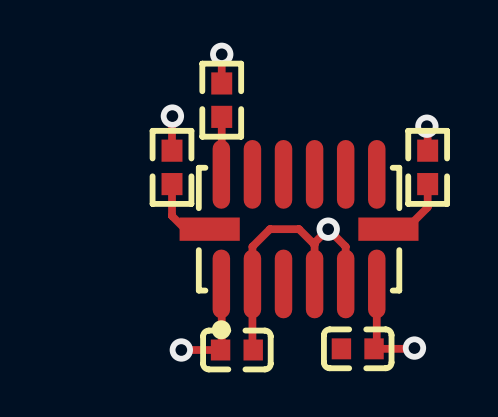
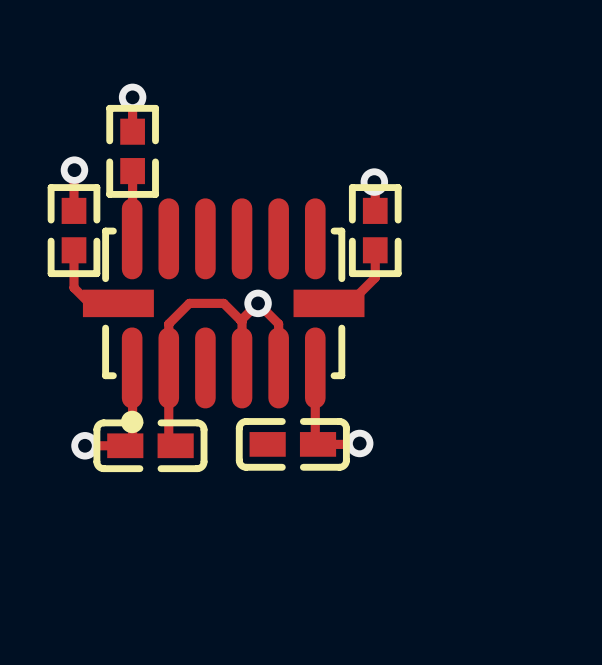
part footprint: [321, 326, 395, 372] -> [235, 418, 350, 471]
part footprint: [200, 327, 274, 373] -> [93, 419, 208, 473]

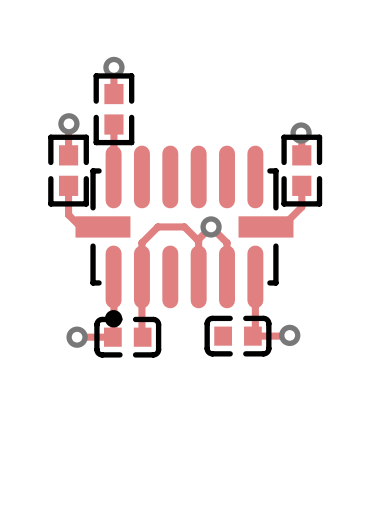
part footprint: [235, 418, 350, 471] -> [204, 315, 272, 357]
part footprint: [93, 419, 208, 473] -> [94, 316, 162, 358]

